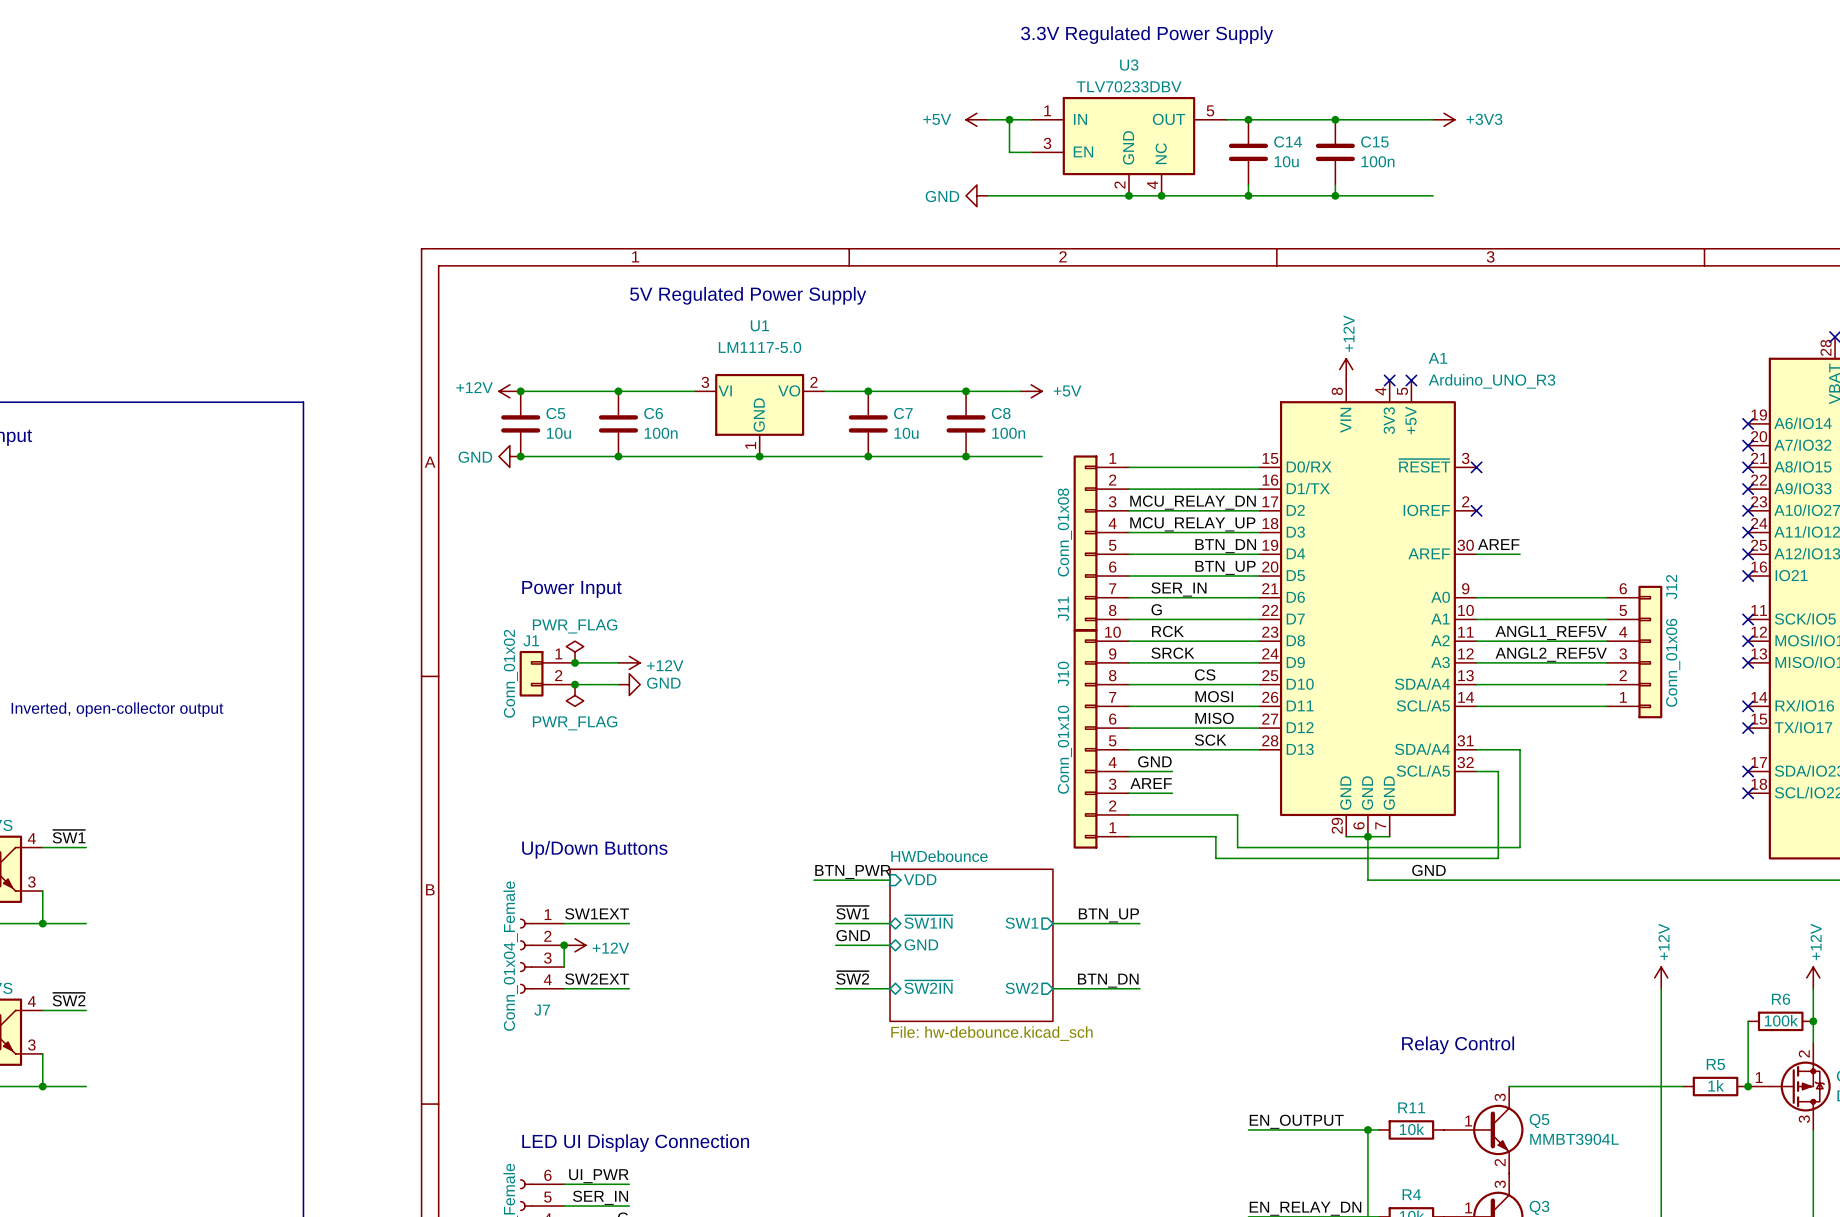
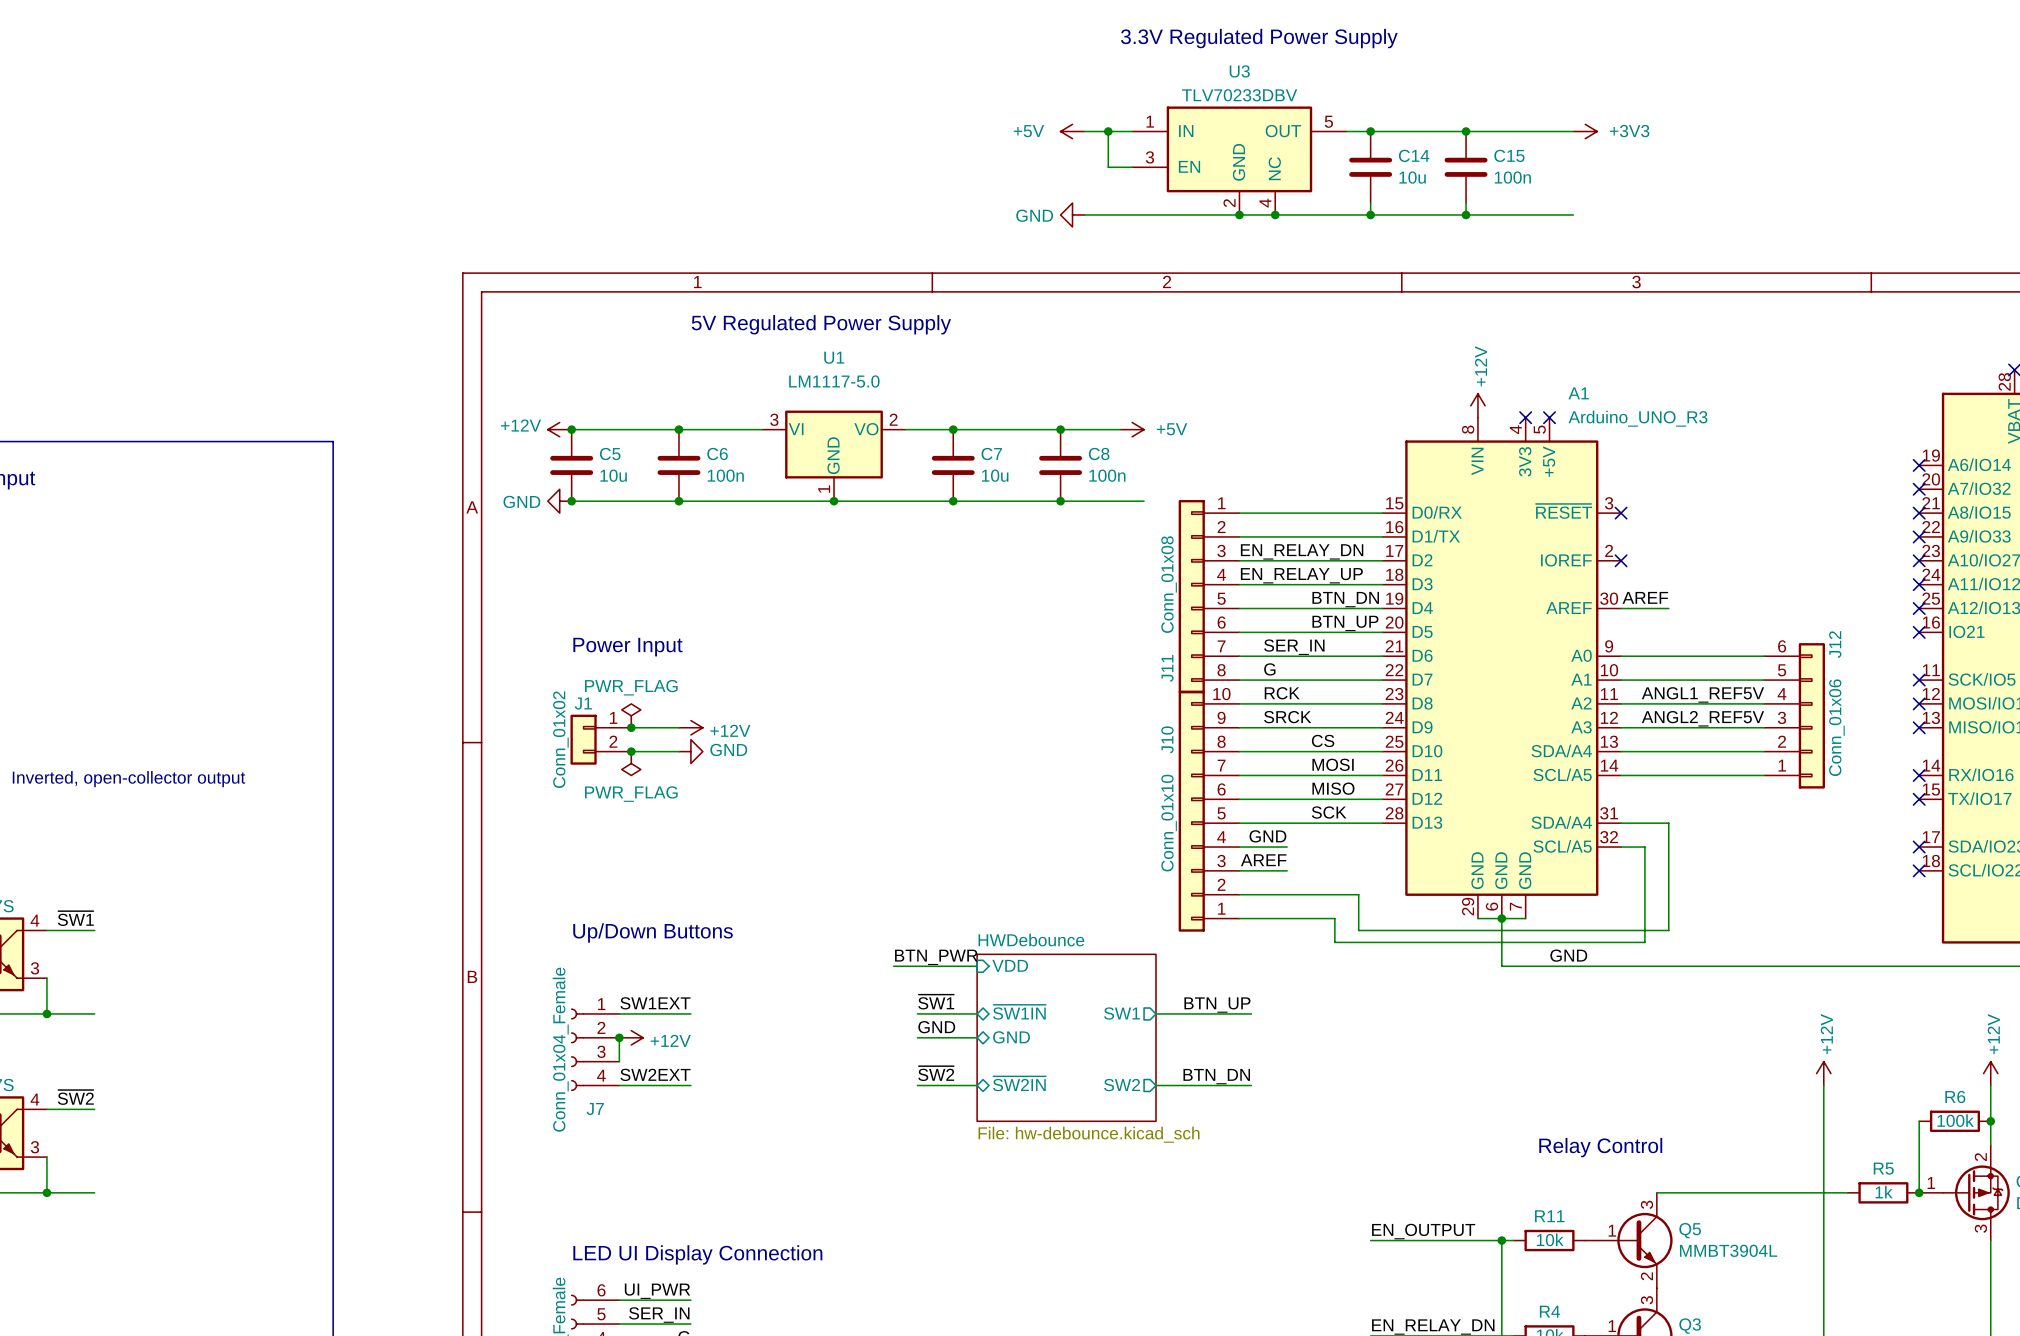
label: MCU_RELAY_DN (1193, 502) -> EN_RELAY_DN (1302, 551)
label: MCU_RELAY_UP (1192, 524) -> EN_RELAY_UP (1301, 575)

